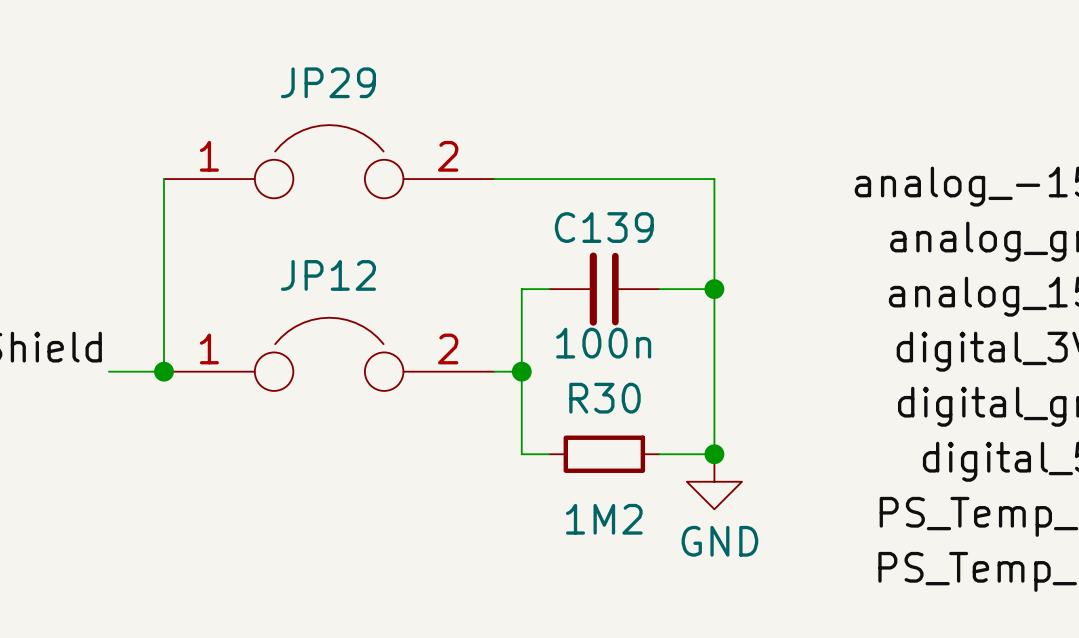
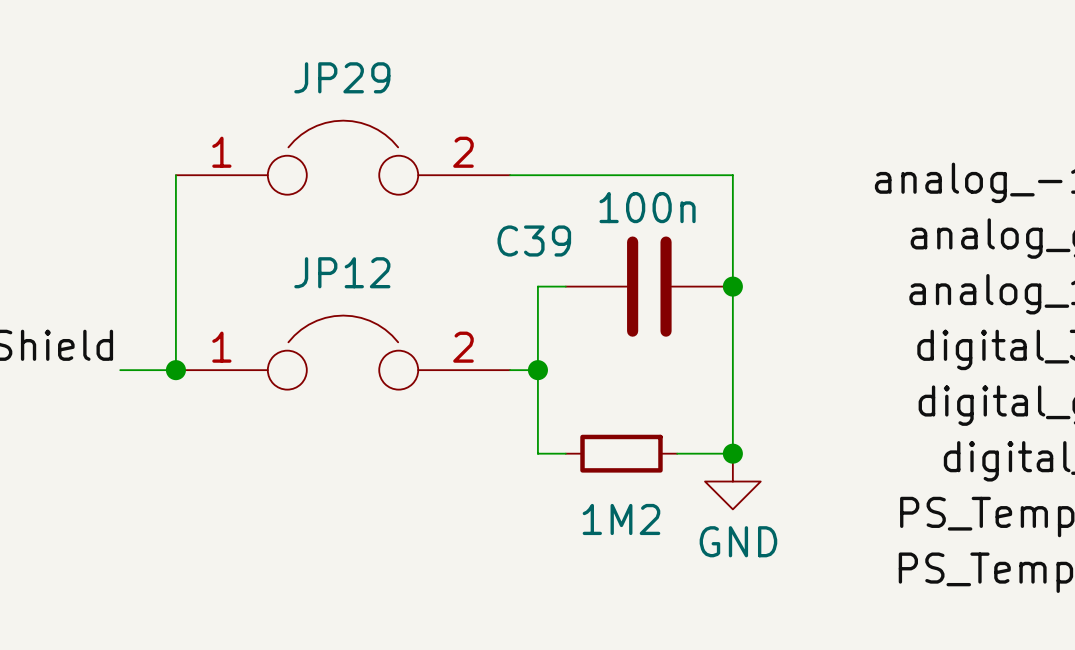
C139: 100n (604, 289) -> none
C39: none -> 100n (649, 286)
R30 name: R30 (604, 398) -> none

